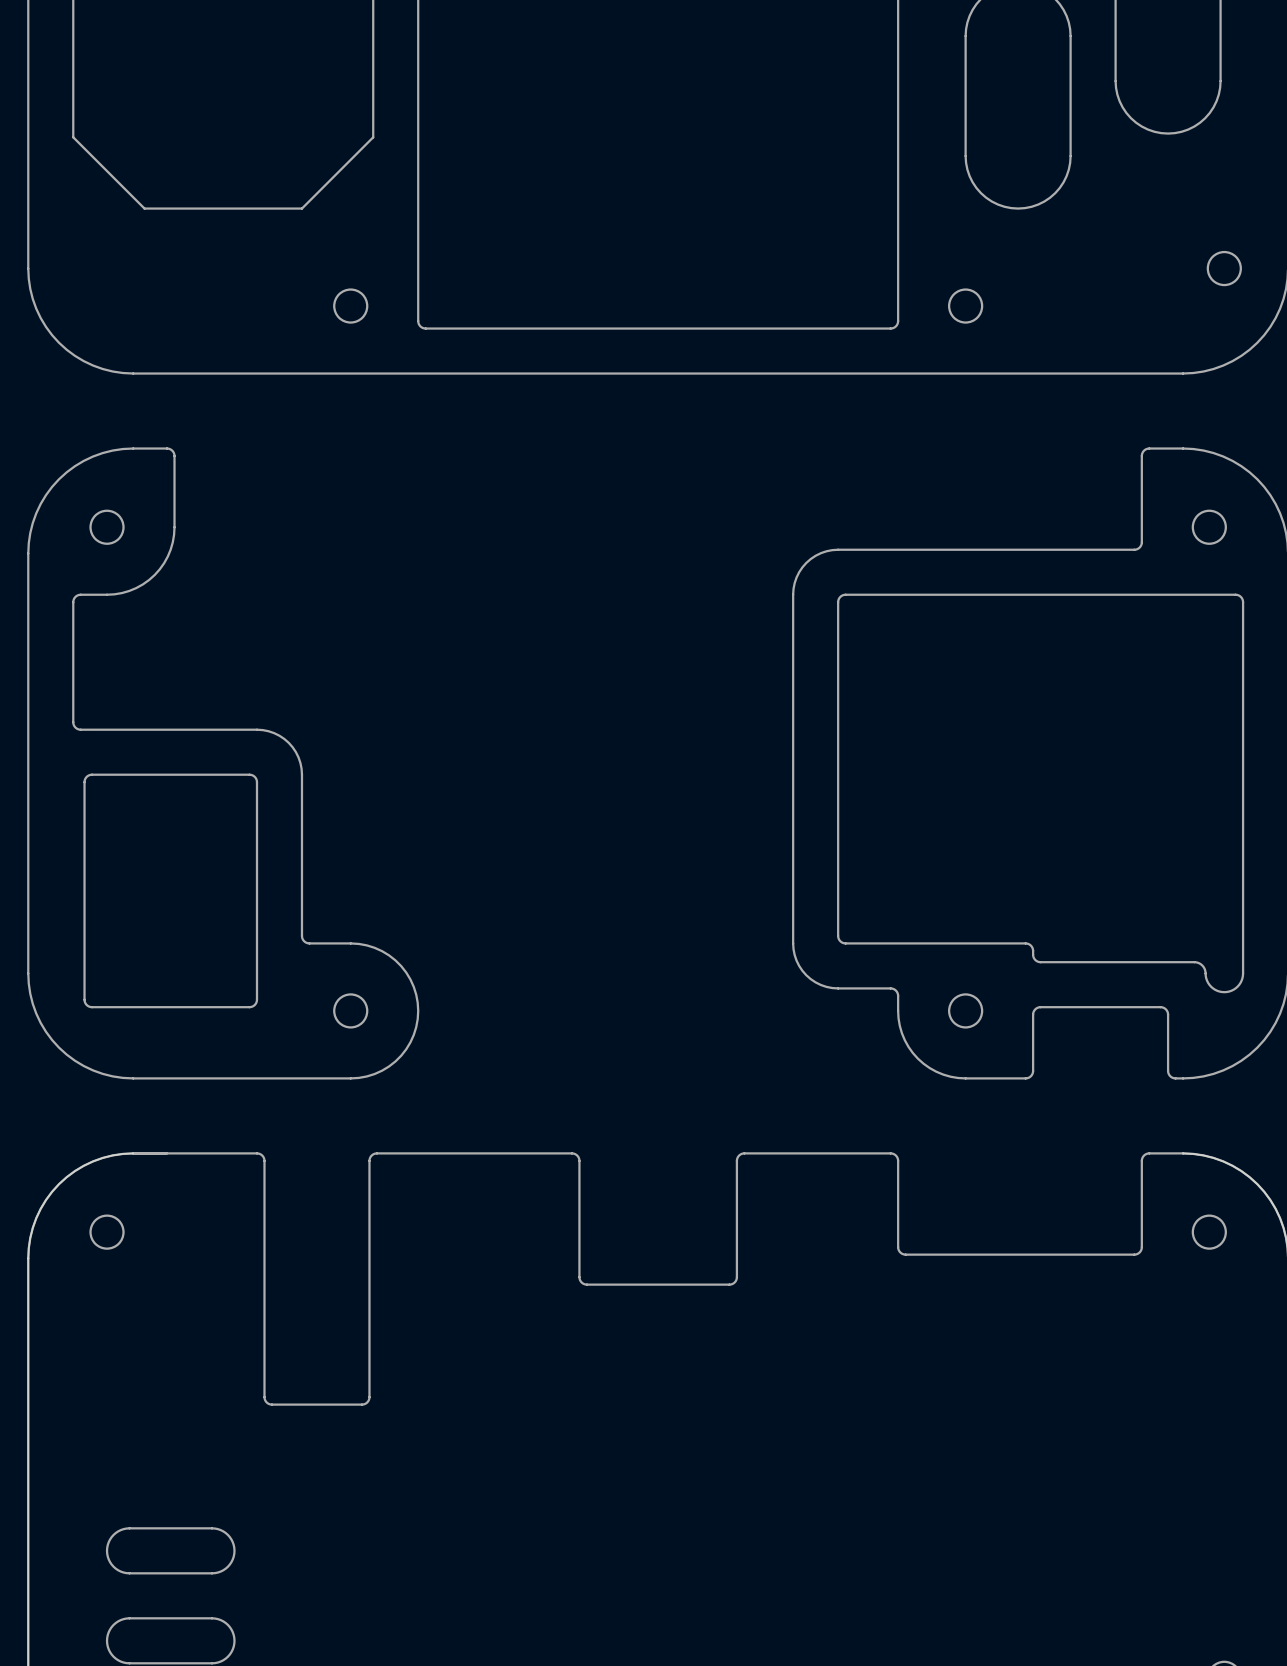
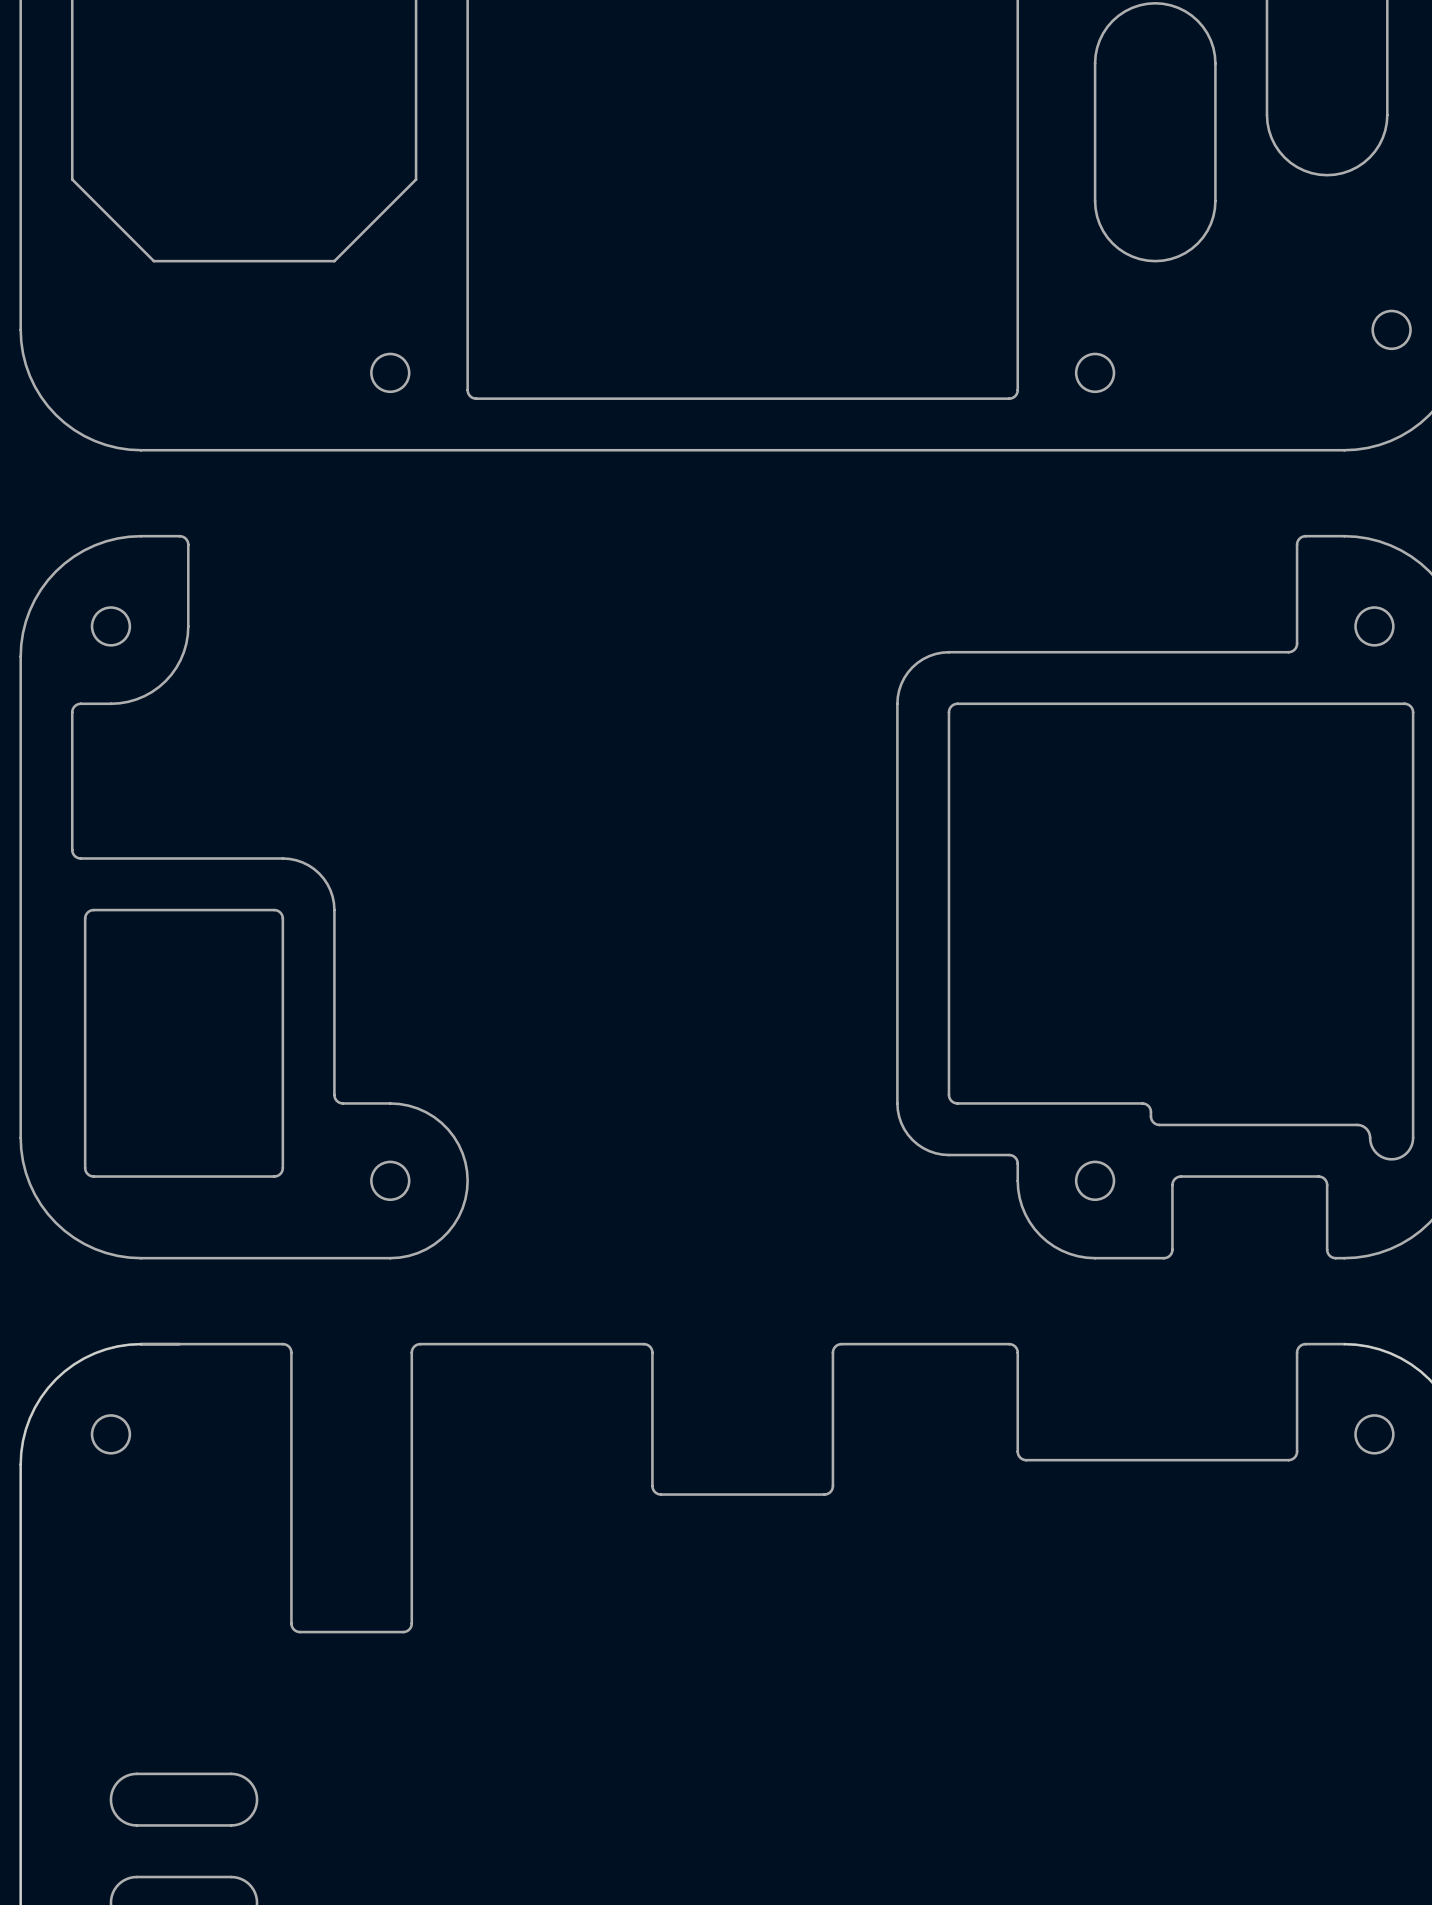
line: (1006, 943) (1029, 944) (1032, 948) (1034, 958) (1040, 962) -> (1142, 1103) (1149, 1107) (1151, 1119) (1155, 1123) (1181, 1124)

